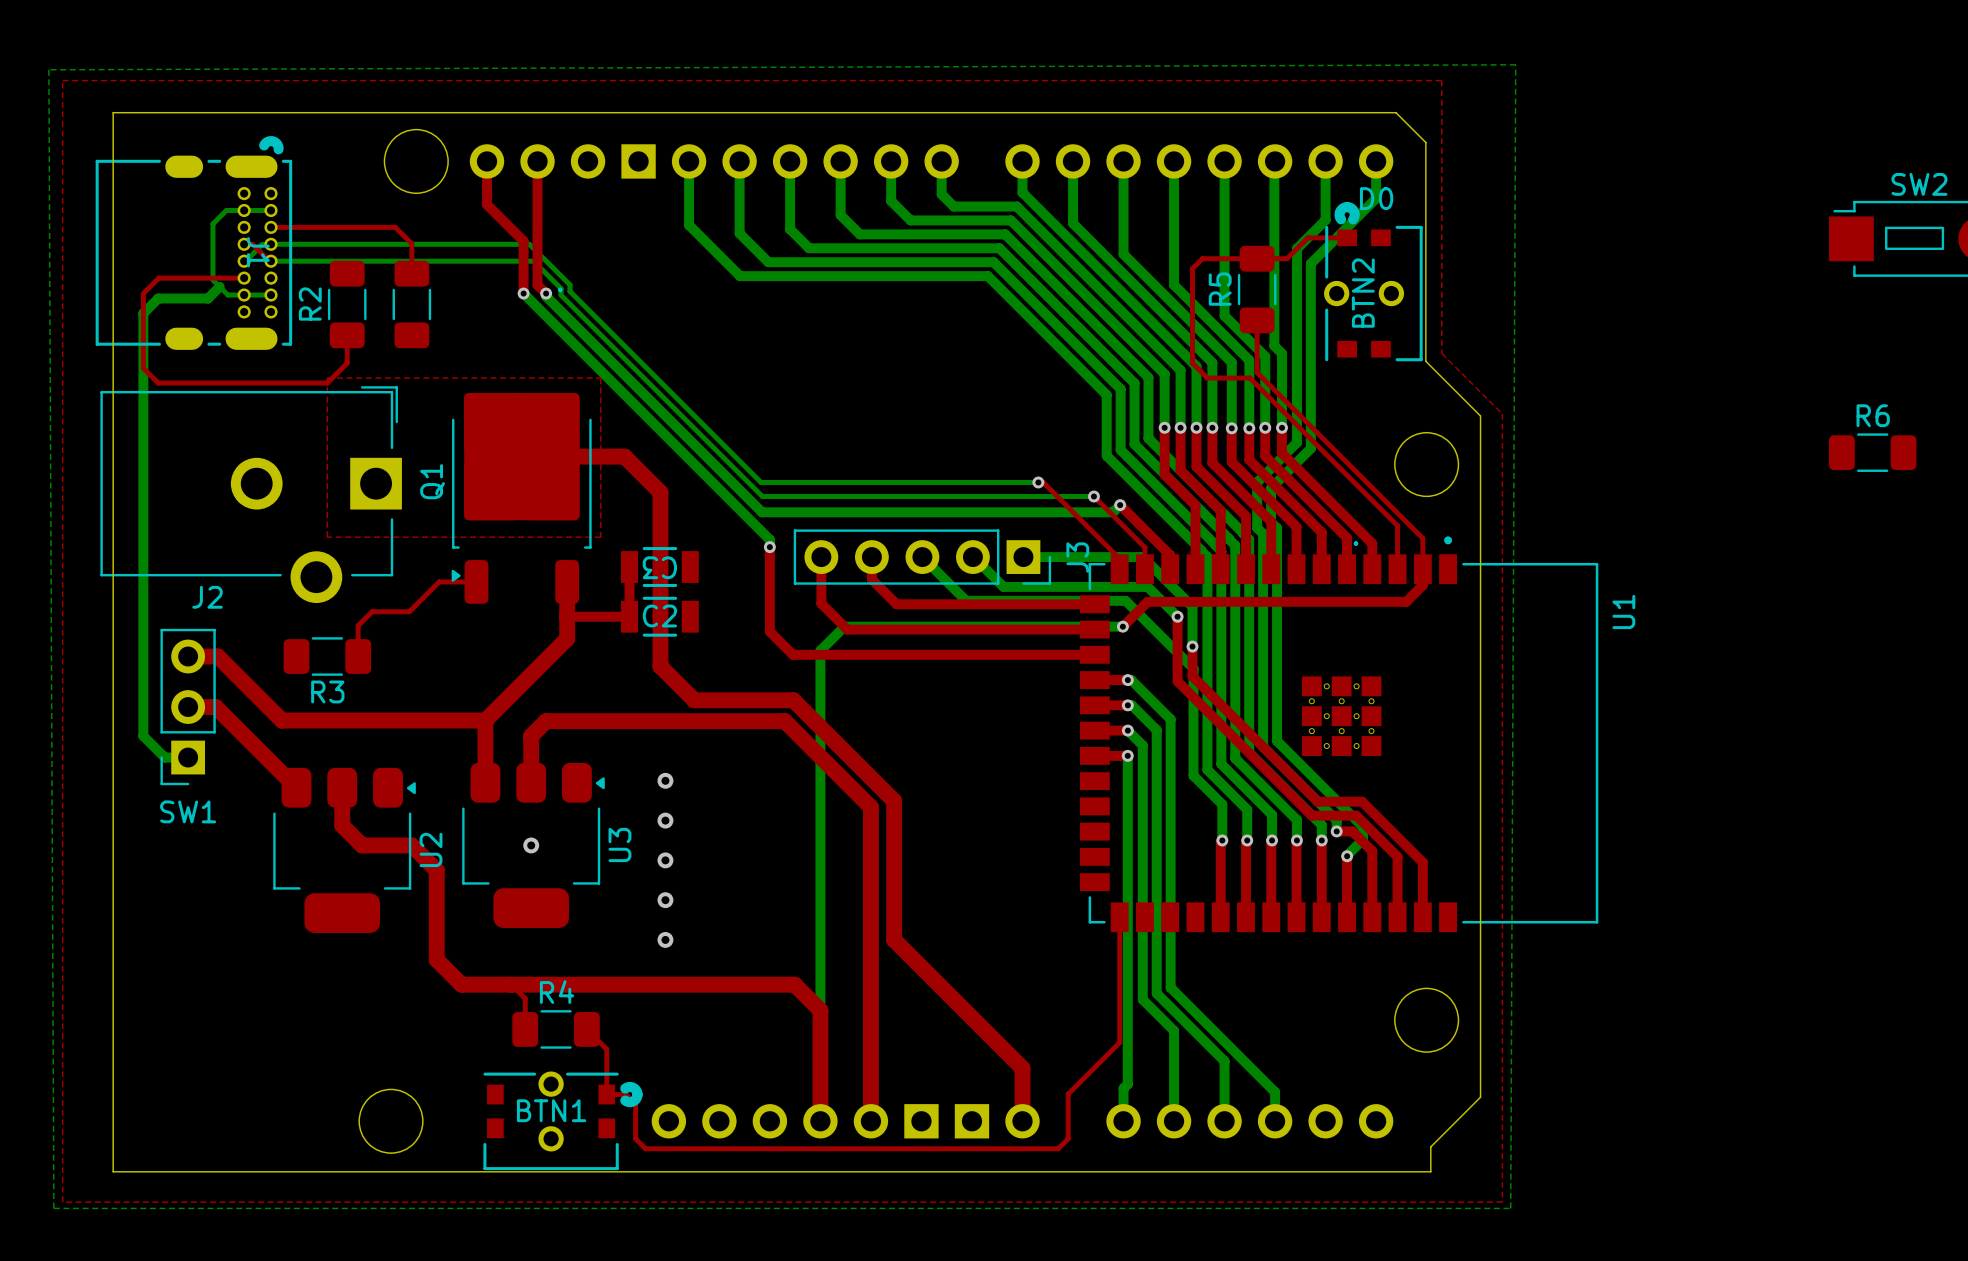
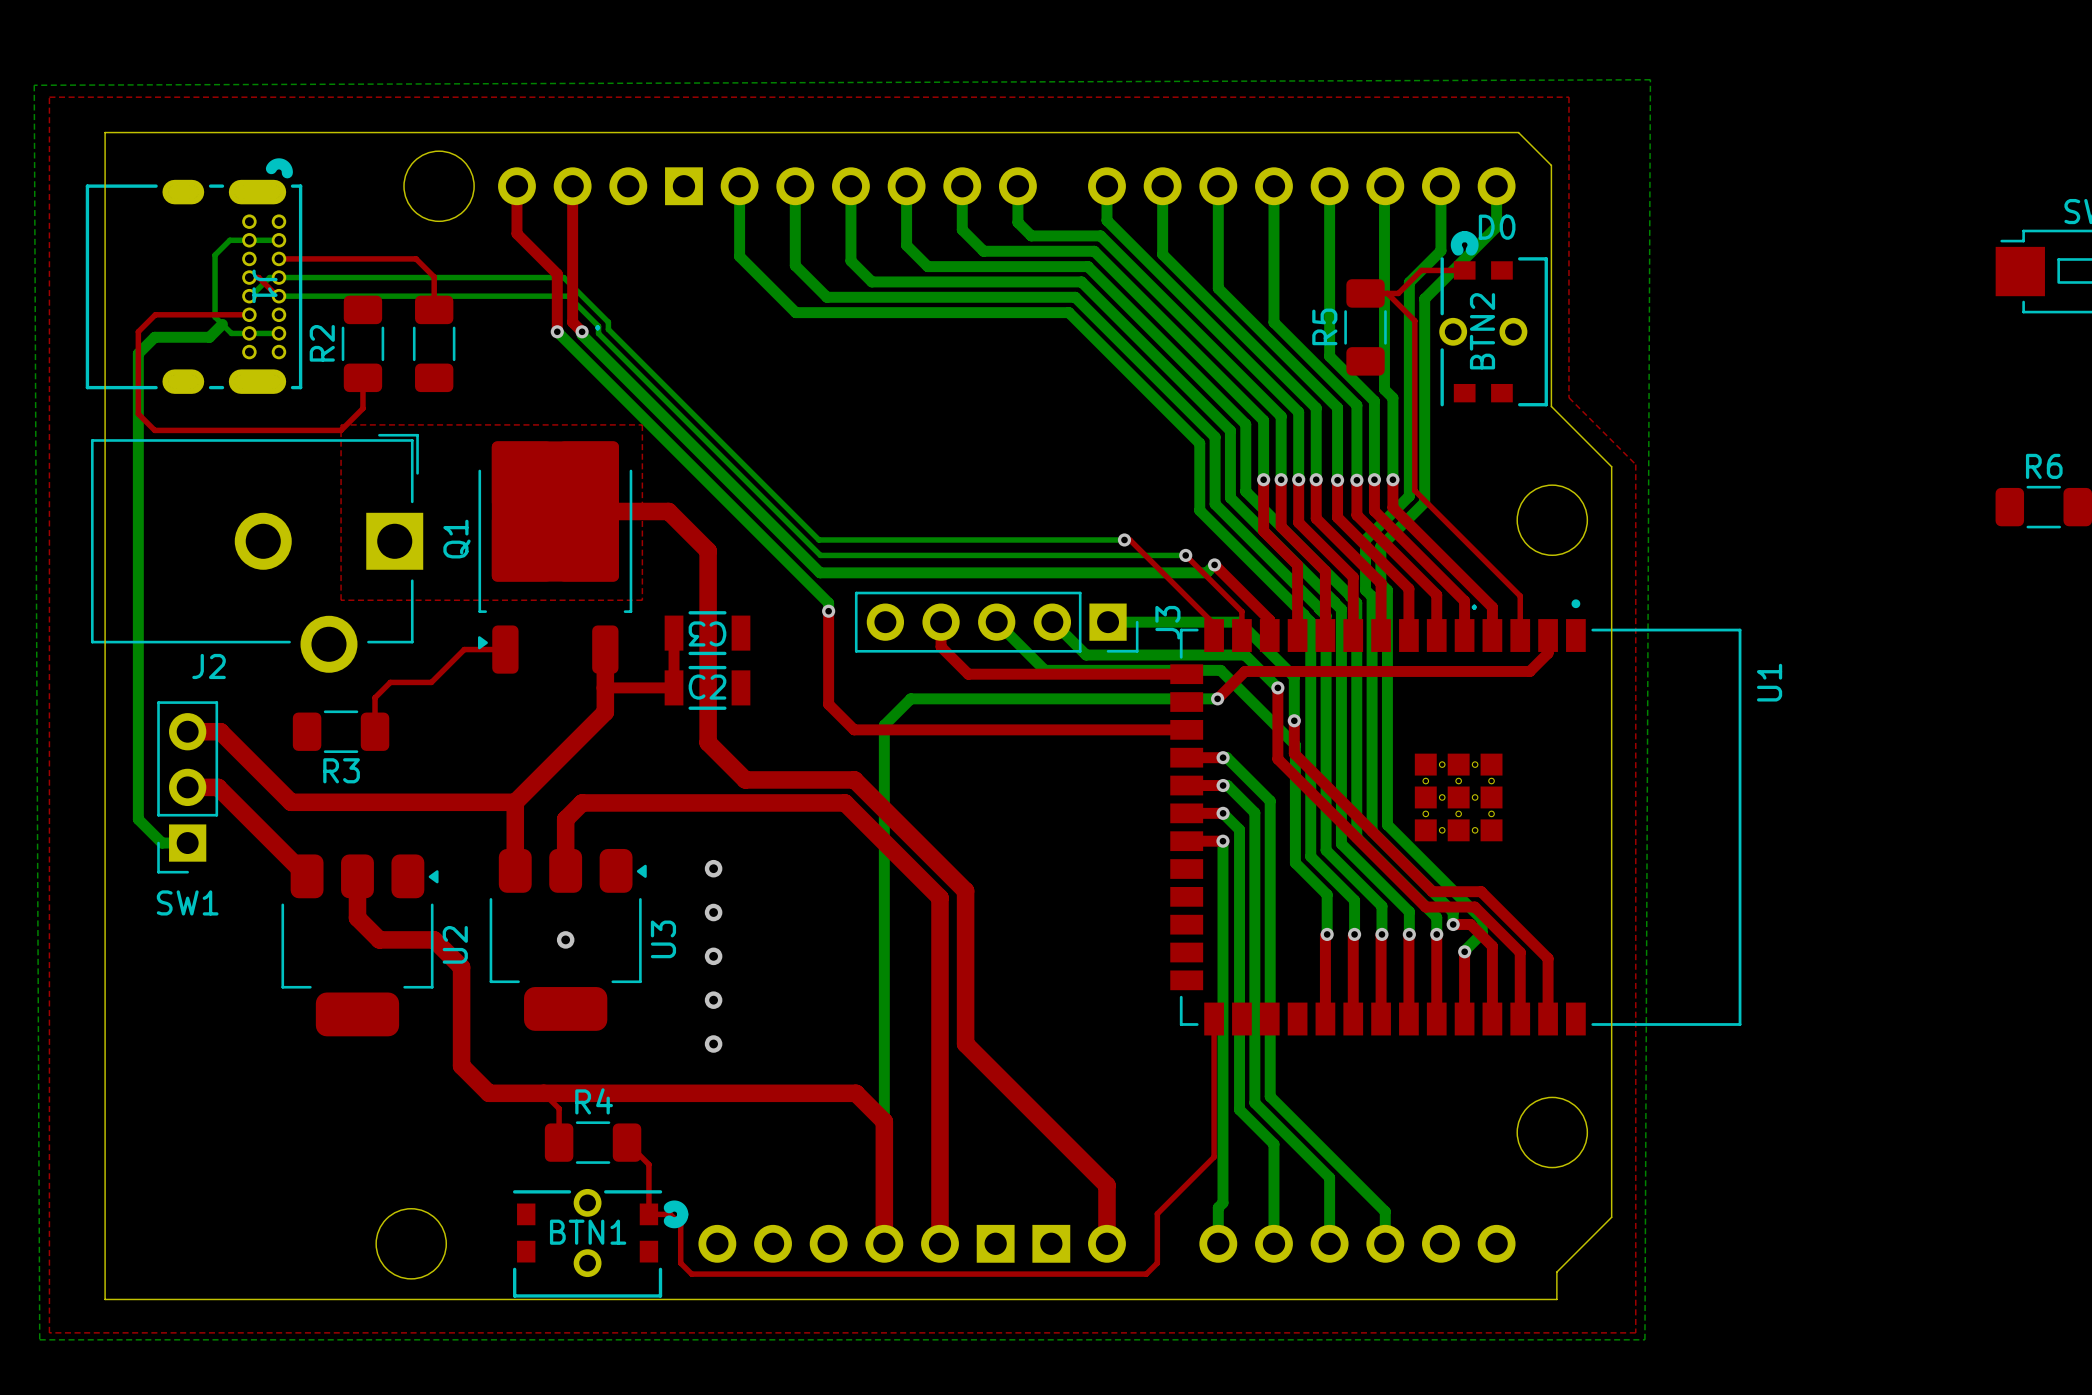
top track: (1257, 258) (1202, 258) (1192, 268) (1192, 363) (1207, 378) (1249, 378) (1397, 525) (1397, 533) -> (1387, 293) (1414, 320) (1414, 490) (1520, 596)
top track: (1257, 320) (1257, 372) (1422, 538) (1422, 569) -> none
top track: (821, 557) (821, 603) (847, 629) (1094, 629) -> none

